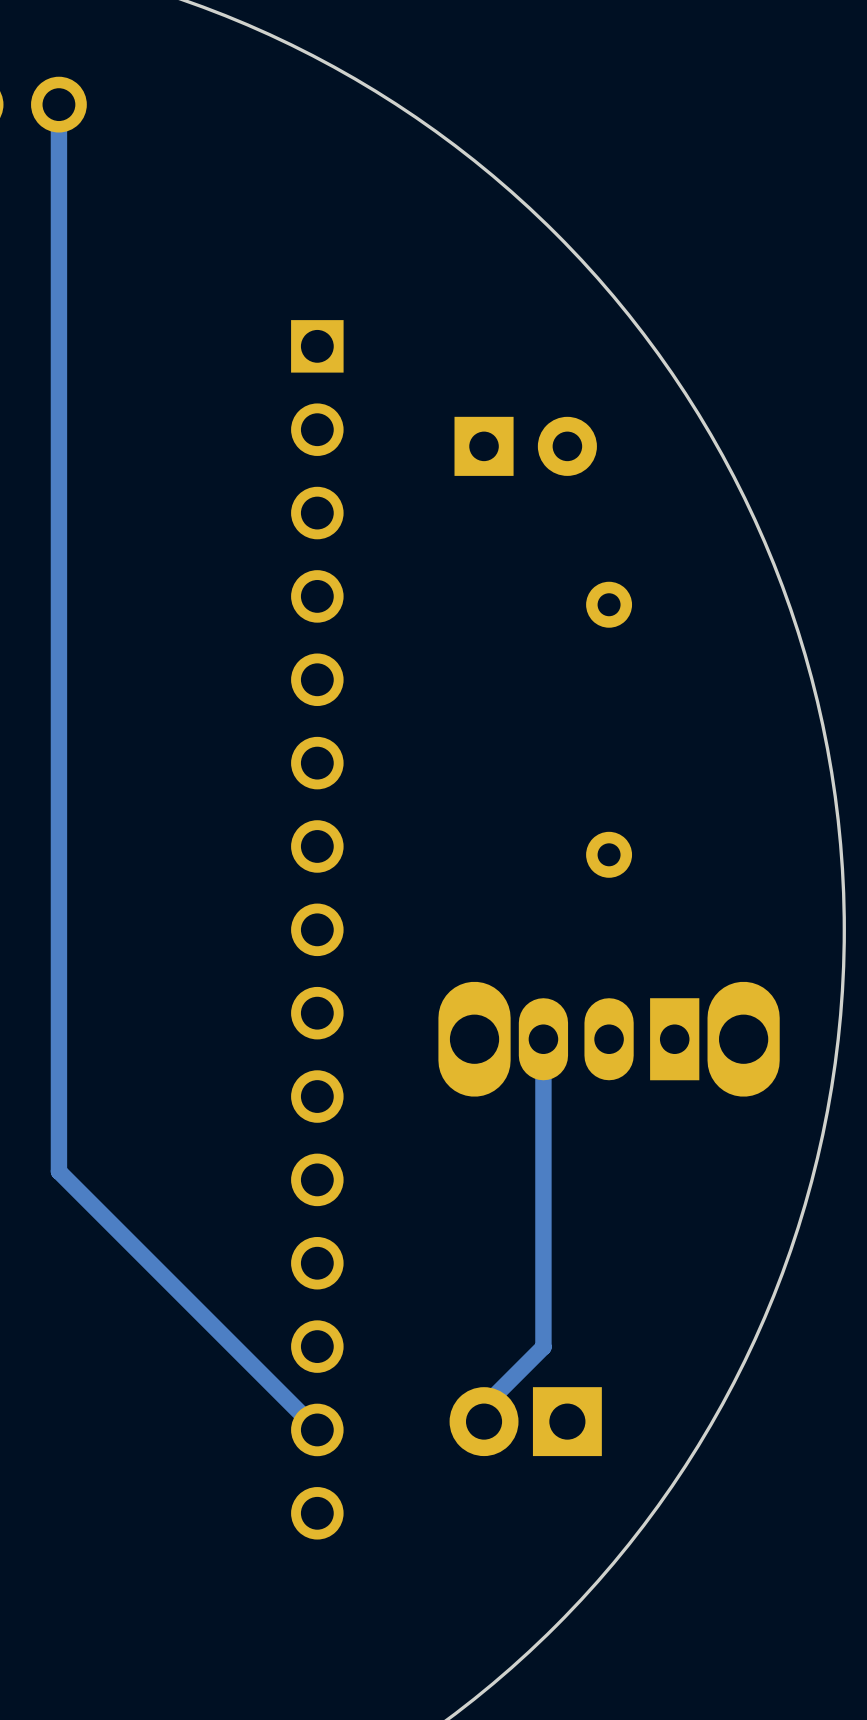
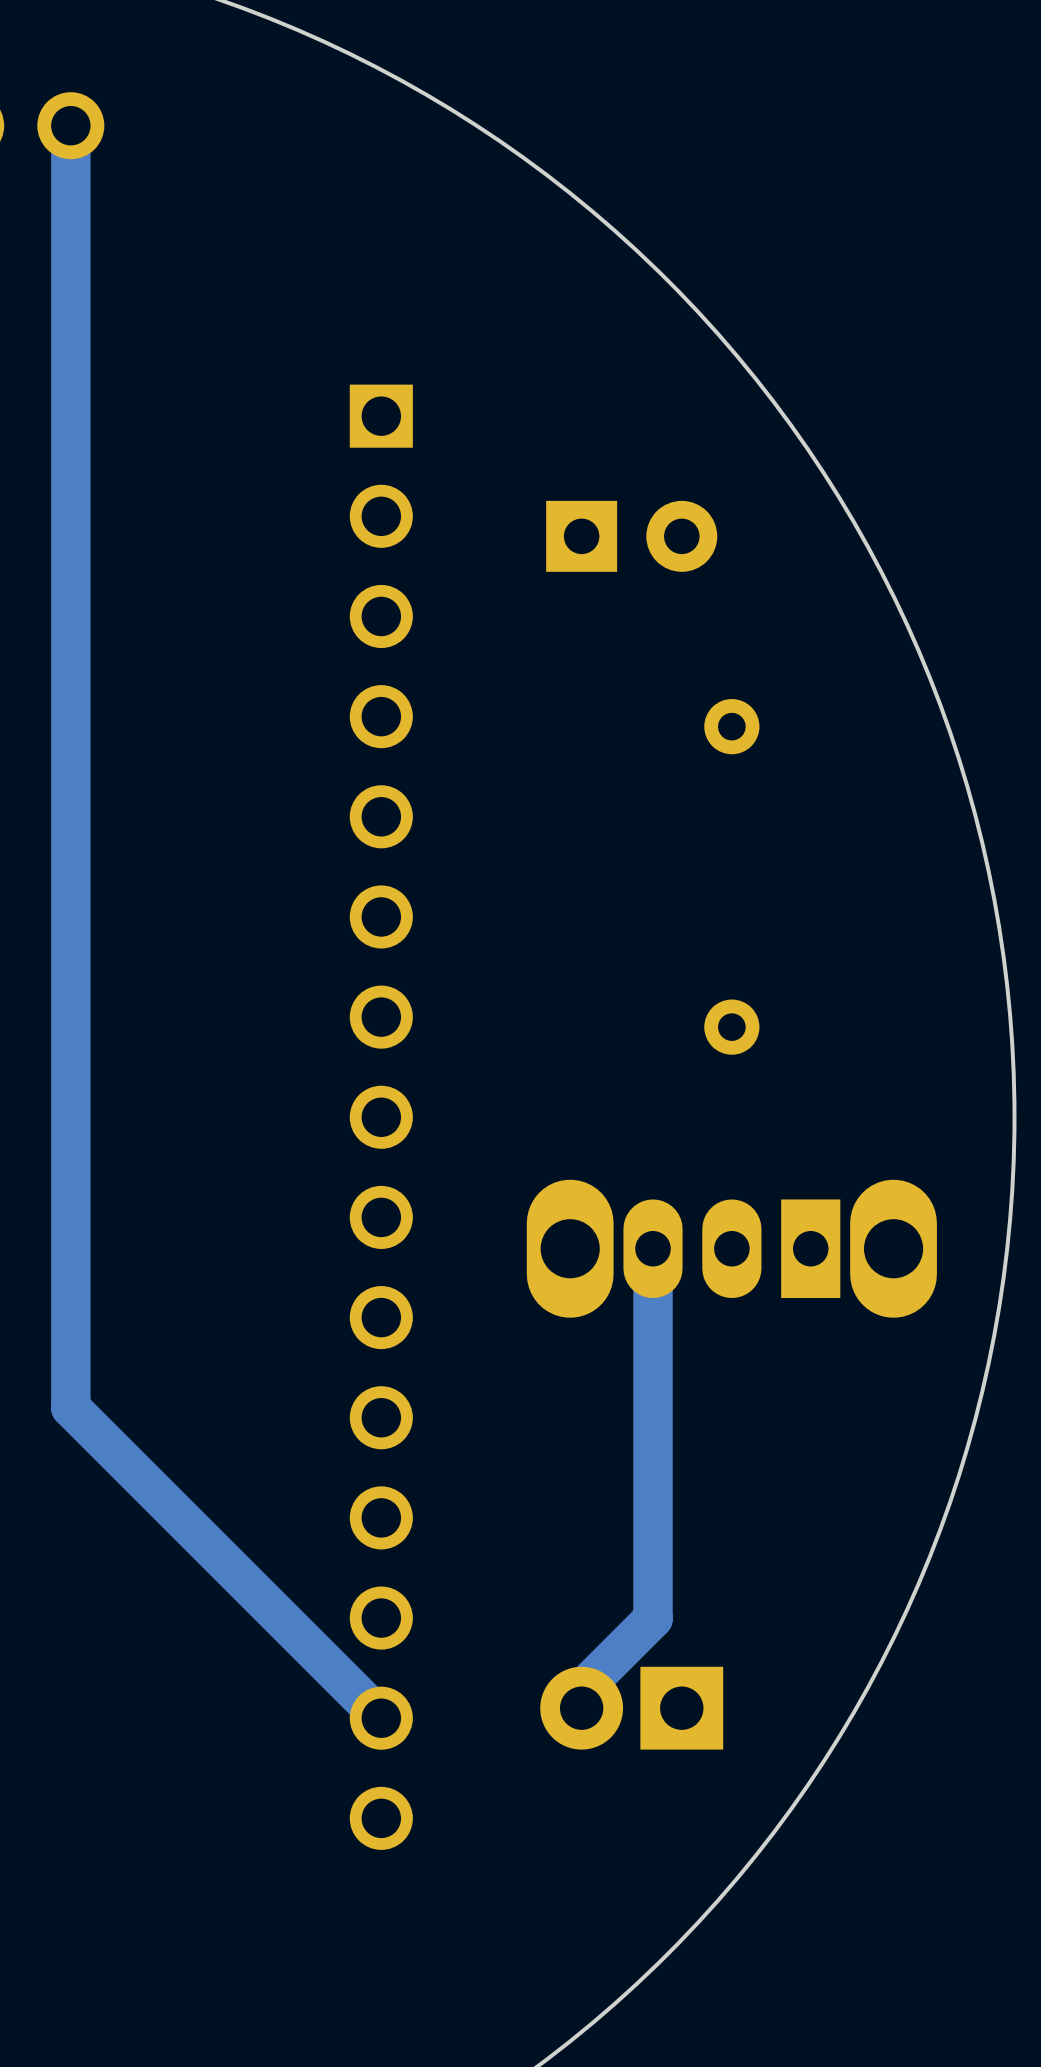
track width: thin (58, 104) (58, 1171) (317, 1429) -> thick (70, 125) (70, 1407) (381, 1718)
track width: thin (543, 1039) (543, 1347) (484, 1406) (484, 1421) -> thick (652, 1248) (652, 1618) (581, 1690) (581, 1708)

